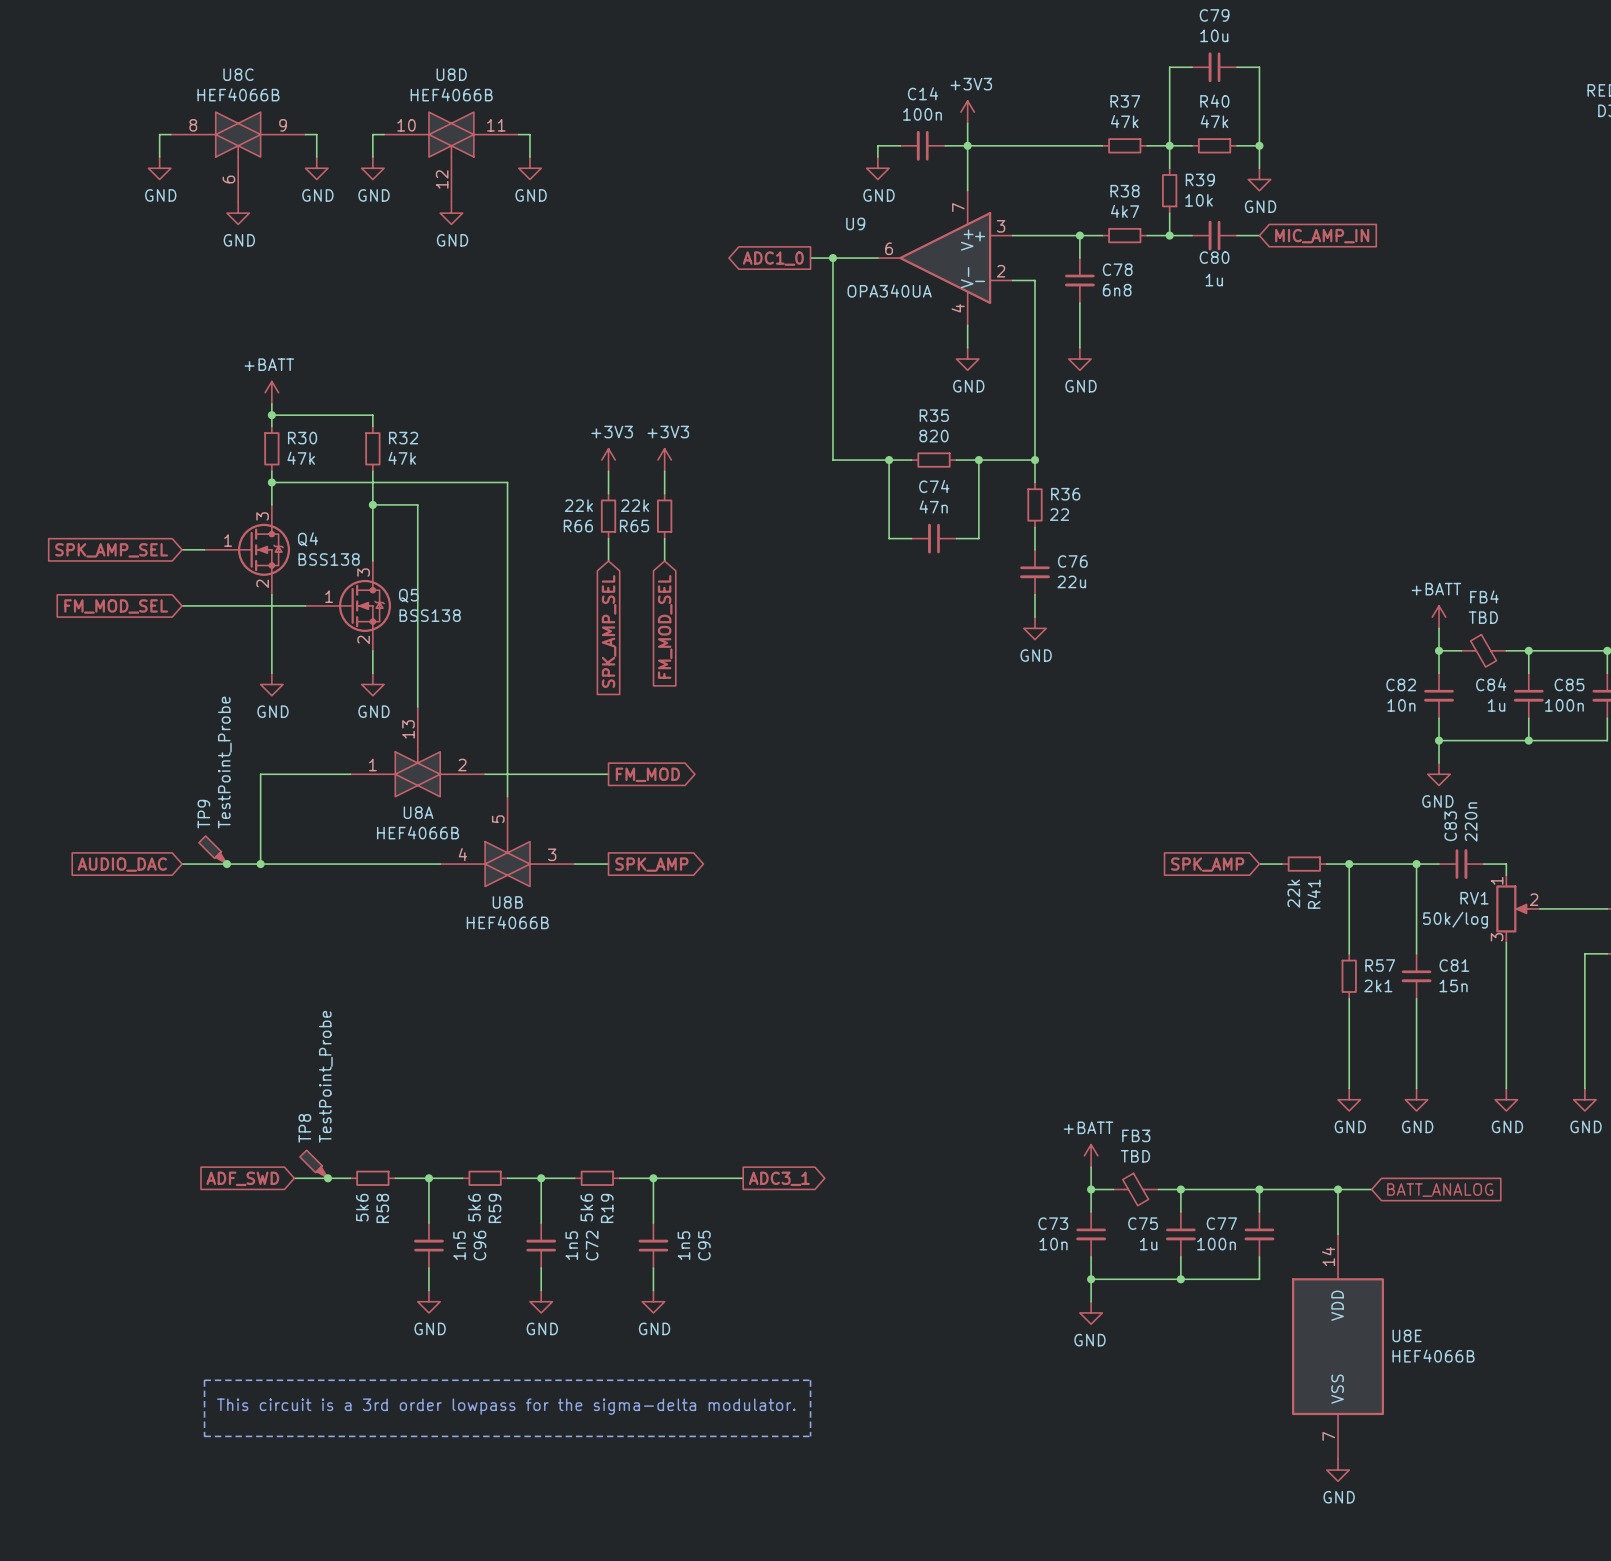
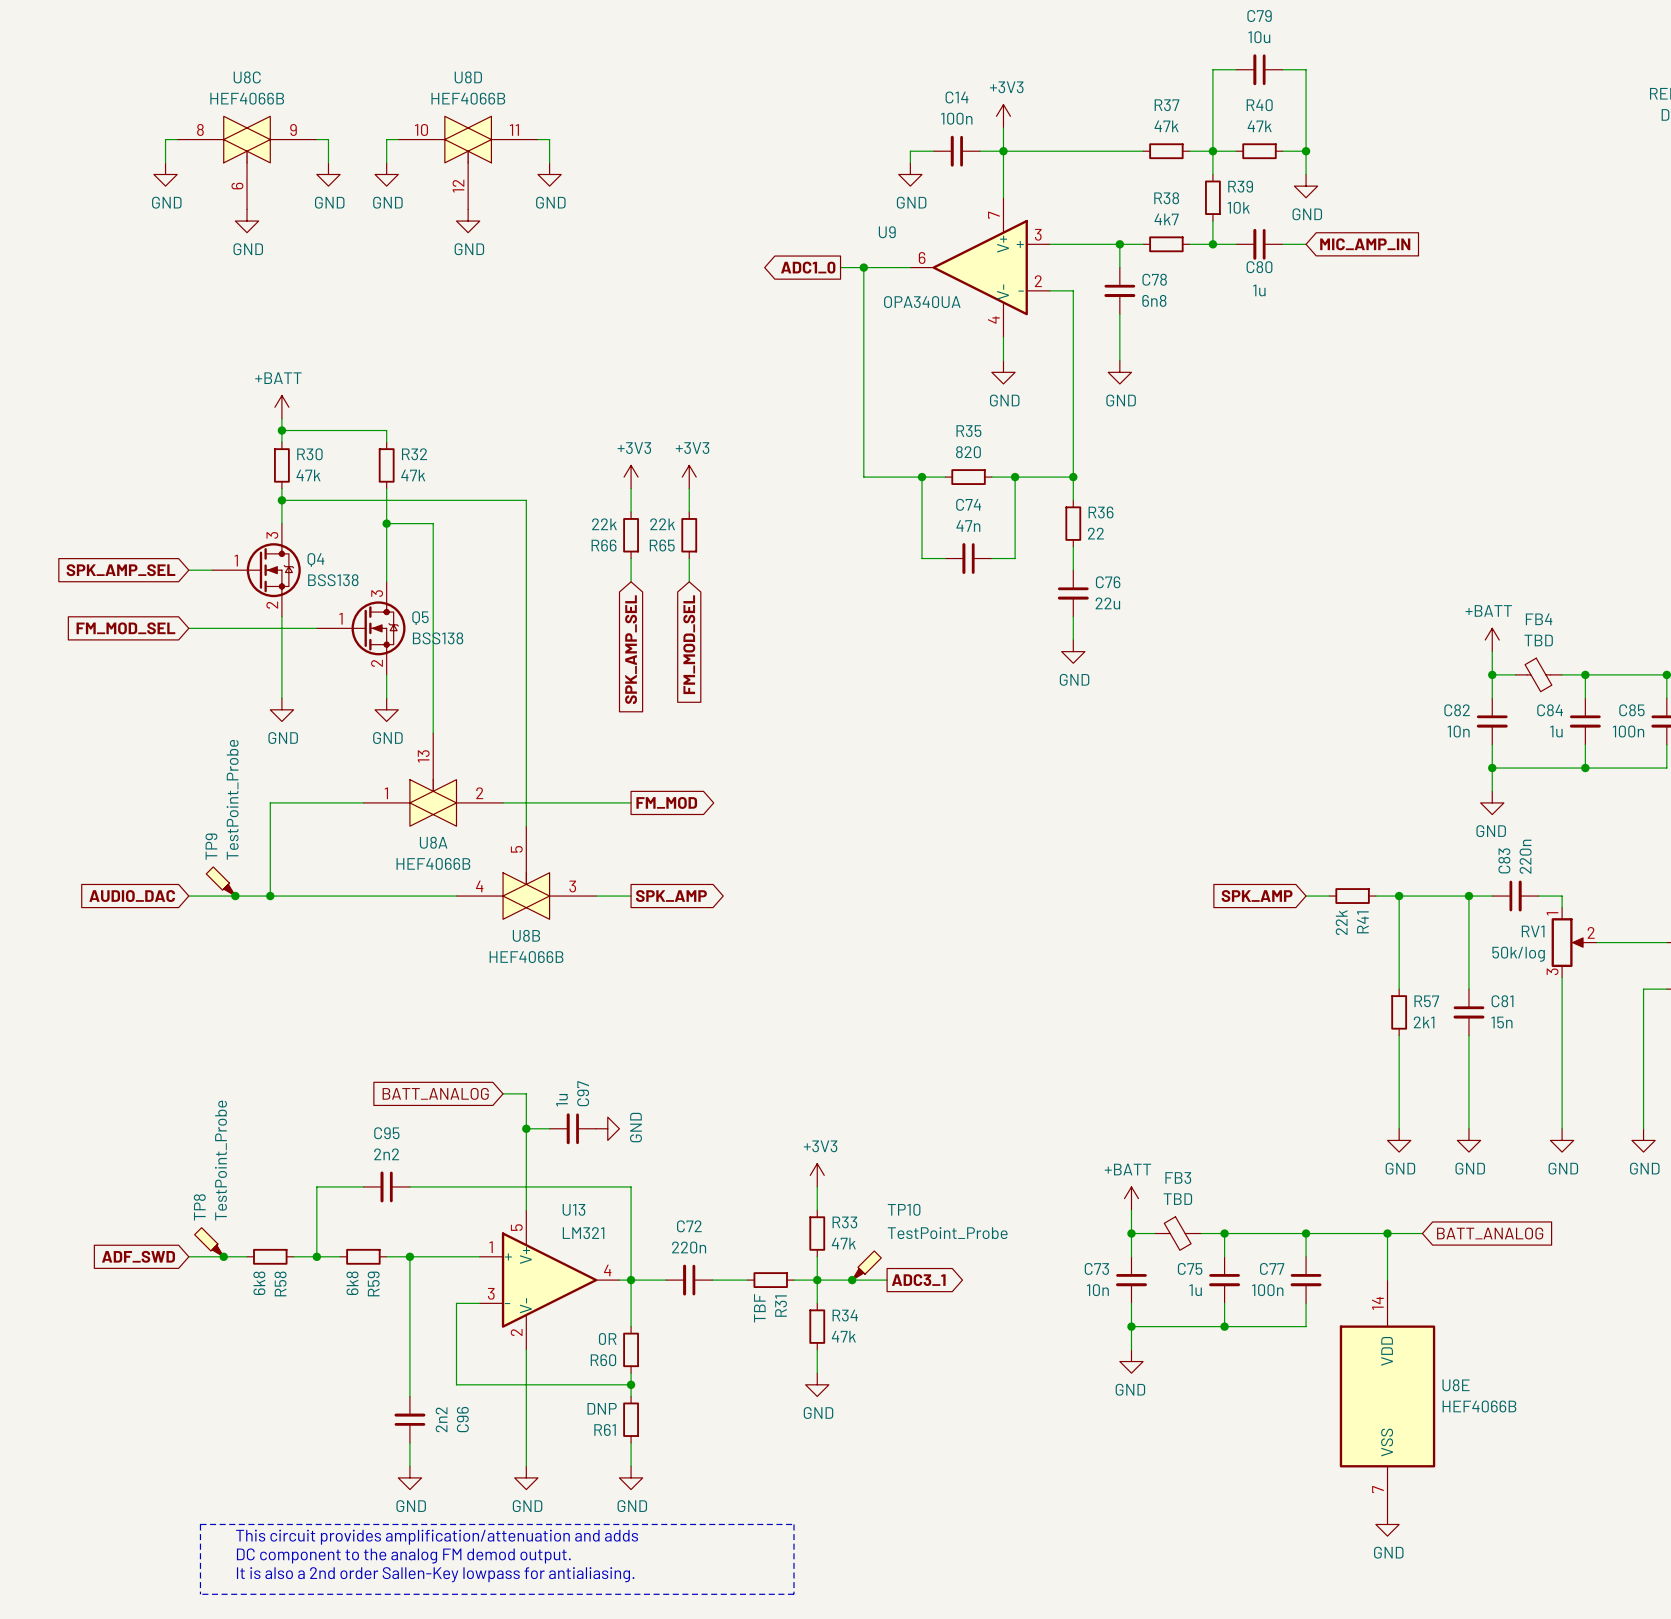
wire: none -> (503, 1093) (526, 1093) (526, 1210)
global label: none -> BATT_ANALOG (435, 1093)
wire: none -> (526, 1128) (549, 1128)
junction: none -> (526, 1128)
C97: none -> 1u (572, 1128)
power symbol: none -> GND (607, 1128)
power symbol: none -> +3V3 (817, 1175)
wire: none -> (363, 1186) (316, 1186) (316, 1256)
wire: none -> (409, 1186) (631, 1186) (631, 1326)
wire: none -> (817, 1186) (817, 1210)
TP8 position: (313, 1164) -> (209, 1242)
global label position: ADF_SWD (242, 1178) -> ADF_SWD (138, 1256)
wire: (294, 1178) (350, 1178) -> (188, 1256) (247, 1256)
junction: (327, 1178) -> none
R58 position: (372, 1178) -> (270, 1256)
wire: (395, 1178) (462, 1178) -> none
wire: (428, 1178) (428, 1223) -> none
junction: (428, 1178) -> none
R59 position: (485, 1178) -> (363, 1256)
wire: (507, 1178) (574, 1178) -> none
wire: (541, 1178) (541, 1223) -> none
junction: (541, 1178) -> none
R19: 5k6 (597, 1178) -> none
wire: (619, 1178) (743, 1178) -> none
wire: (653, 1178) (653, 1223) -> (817, 1256) (817, 1303)
junction: (653, 1178) -> none
global label position: ADC3_1 (779, 1178) -> ADC3_1 (918, 1280)
R33: none -> 47k (817, 1233)
R58 value: 5k6 (362, 1207) -> 6k8 (259, 1283)
R59 value: 5k6 (474, 1207) -> 6k8 (352, 1283)
junction: none -> (223, 1256)
wire: none -> (293, 1256) (340, 1256)
junction: none -> (316, 1256)
wire: none -> (386, 1256) (479, 1256)
wire: none -> (409, 1256) (409, 1396)
junction: none -> (409, 1256)
TP10: none -> TestPoint_Probe (866, 1265)
U13: none -> LM321 (549, 1280)
wire: none -> (619, 1280) (665, 1280)
junction: none -> (631, 1280)
wire: none -> (712, 1280) (747, 1280)
R31: none -> TBF (770, 1280)
wire: none -> (793, 1280) (887, 1280)
junction: none -> (817, 1280)
junction: none -> (852, 1280)
C96 position: (428, 1245) -> (409, 1419)
C96 value: 1n5 (459, 1245) -> 2n2 (441, 1419)
C72 rotation: 0° (541, 1245) -> 90° counterclockwise (689, 1280)
C72 position: (541, 1245) -> (689, 1280)
C72 value: 1n5 (571, 1245) -> 220n (689, 1247)
C95 rotation: 0° (653, 1245) -> 90° counterclockwise (386, 1186)
C95 position: (653, 1245) -> (386, 1186)
C95 value: 1n5 (683, 1245) -> 2n2 (386, 1154)
wire: none -> (479, 1303) (456, 1303) (456, 1384) (631, 1384)
wire: (428, 1268) (428, 1290) -> (409, 1443) (409, 1466)
wire: (541, 1268) (541, 1290) -> (631, 1373) (631, 1396)
wire: (653, 1268) (653, 1290) -> (817, 1349) (817, 1373)
R34: none -> 47k (817, 1326)
power symbol: GND (428, 1301) -> none
wire: none -> (526, 1349) (526, 1466)
power symbol: GND (541, 1301) -> none
R60: none -> 0R (631, 1349)
power symbol: GND (653, 1301) -> none
junction: none -> (631, 1384)
power symbol: none -> GND (817, 1384)
R61: none -> DNP (631, 1419)
line: (204, 1380) (810, 1380) (810, 1436) (204, 1436) (204, 1380) -> none
wire: none -> (631, 1443) (631, 1466)
text: This circuit is a 3rd order lowpass for the sigma-delta modulator. (506, 1406) -> none
power symbol: none -> GND (409, 1477)
power symbol: none -> GND (526, 1477)
power symbol: none -> GND (631, 1477)
line: none -> (200, 1524) (793, 1524) (793, 1594) (200, 1594) (200, 1524)
text: none -> This circuit provides amplification/attenuation and adds (437, 1537)
text: none -> DC component to the analog FM demod output. (403, 1555)
text: none -> It is also a 2nd order Sallen-Key lowpass for antialiasing. (435, 1574)

